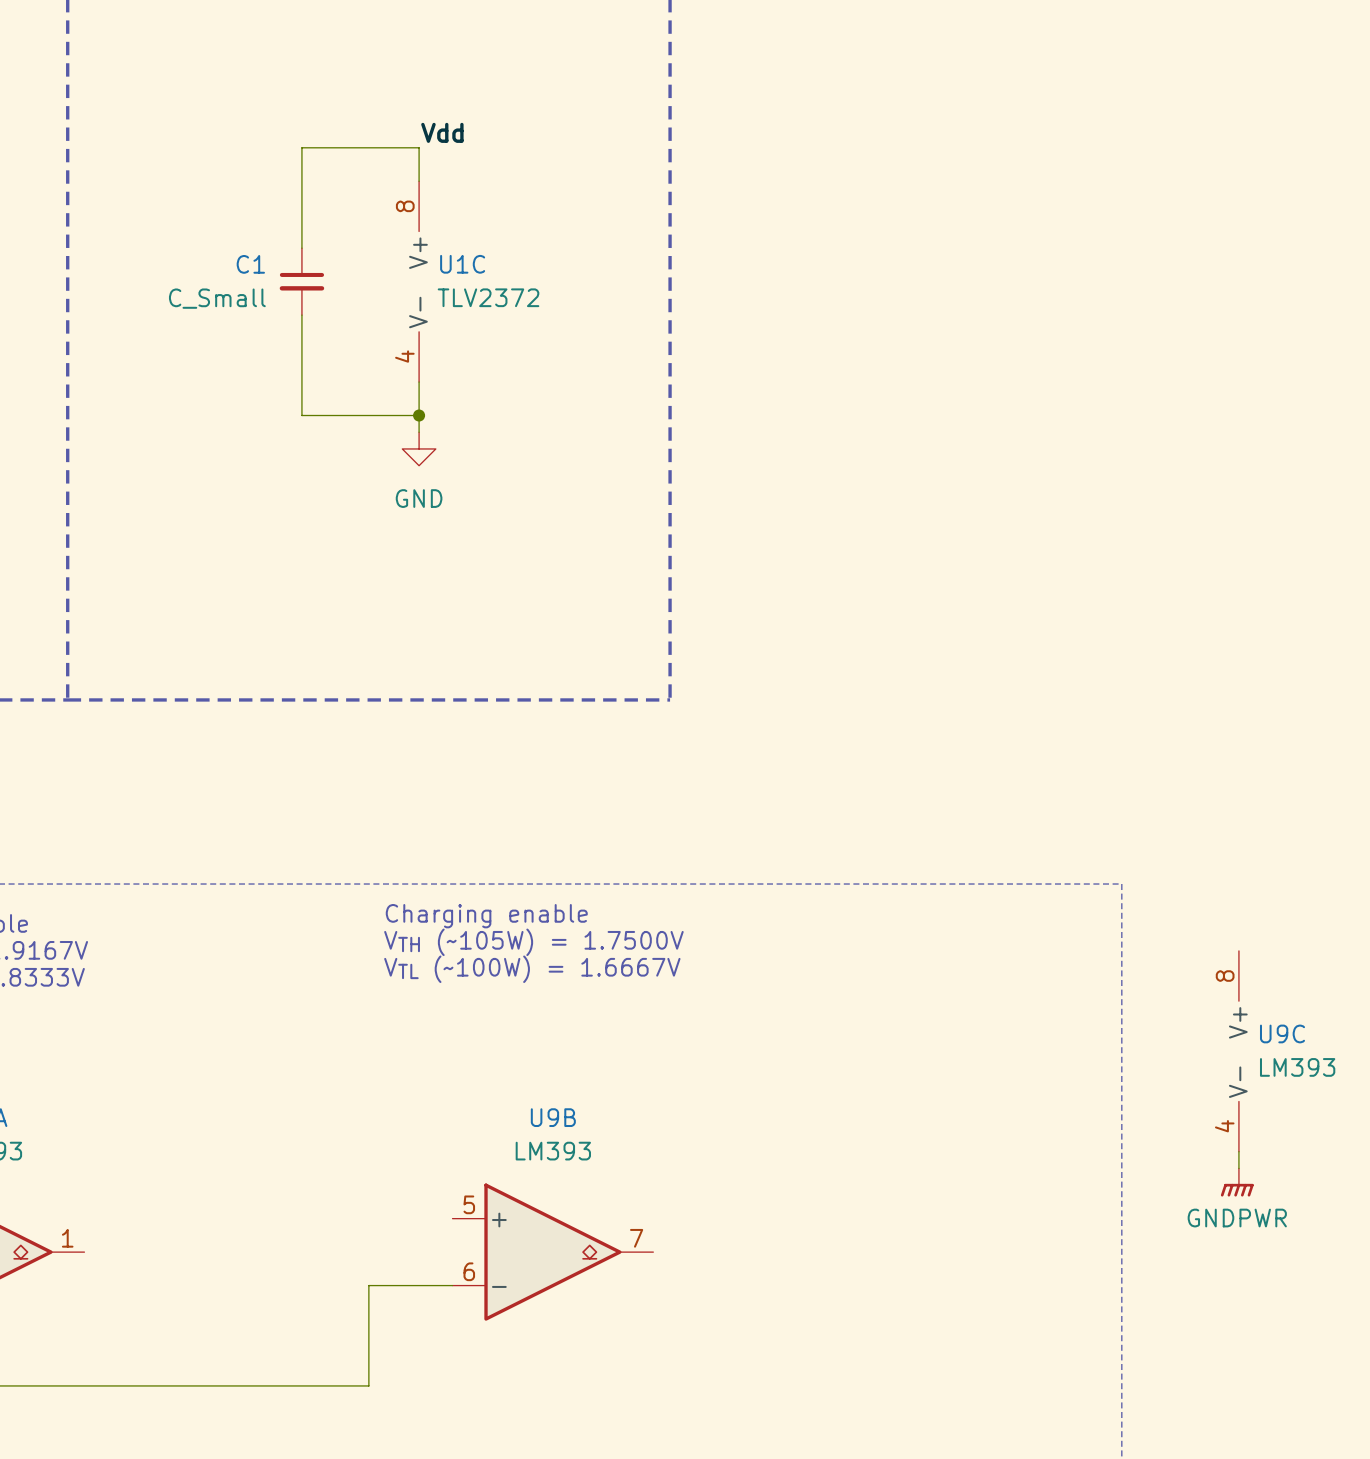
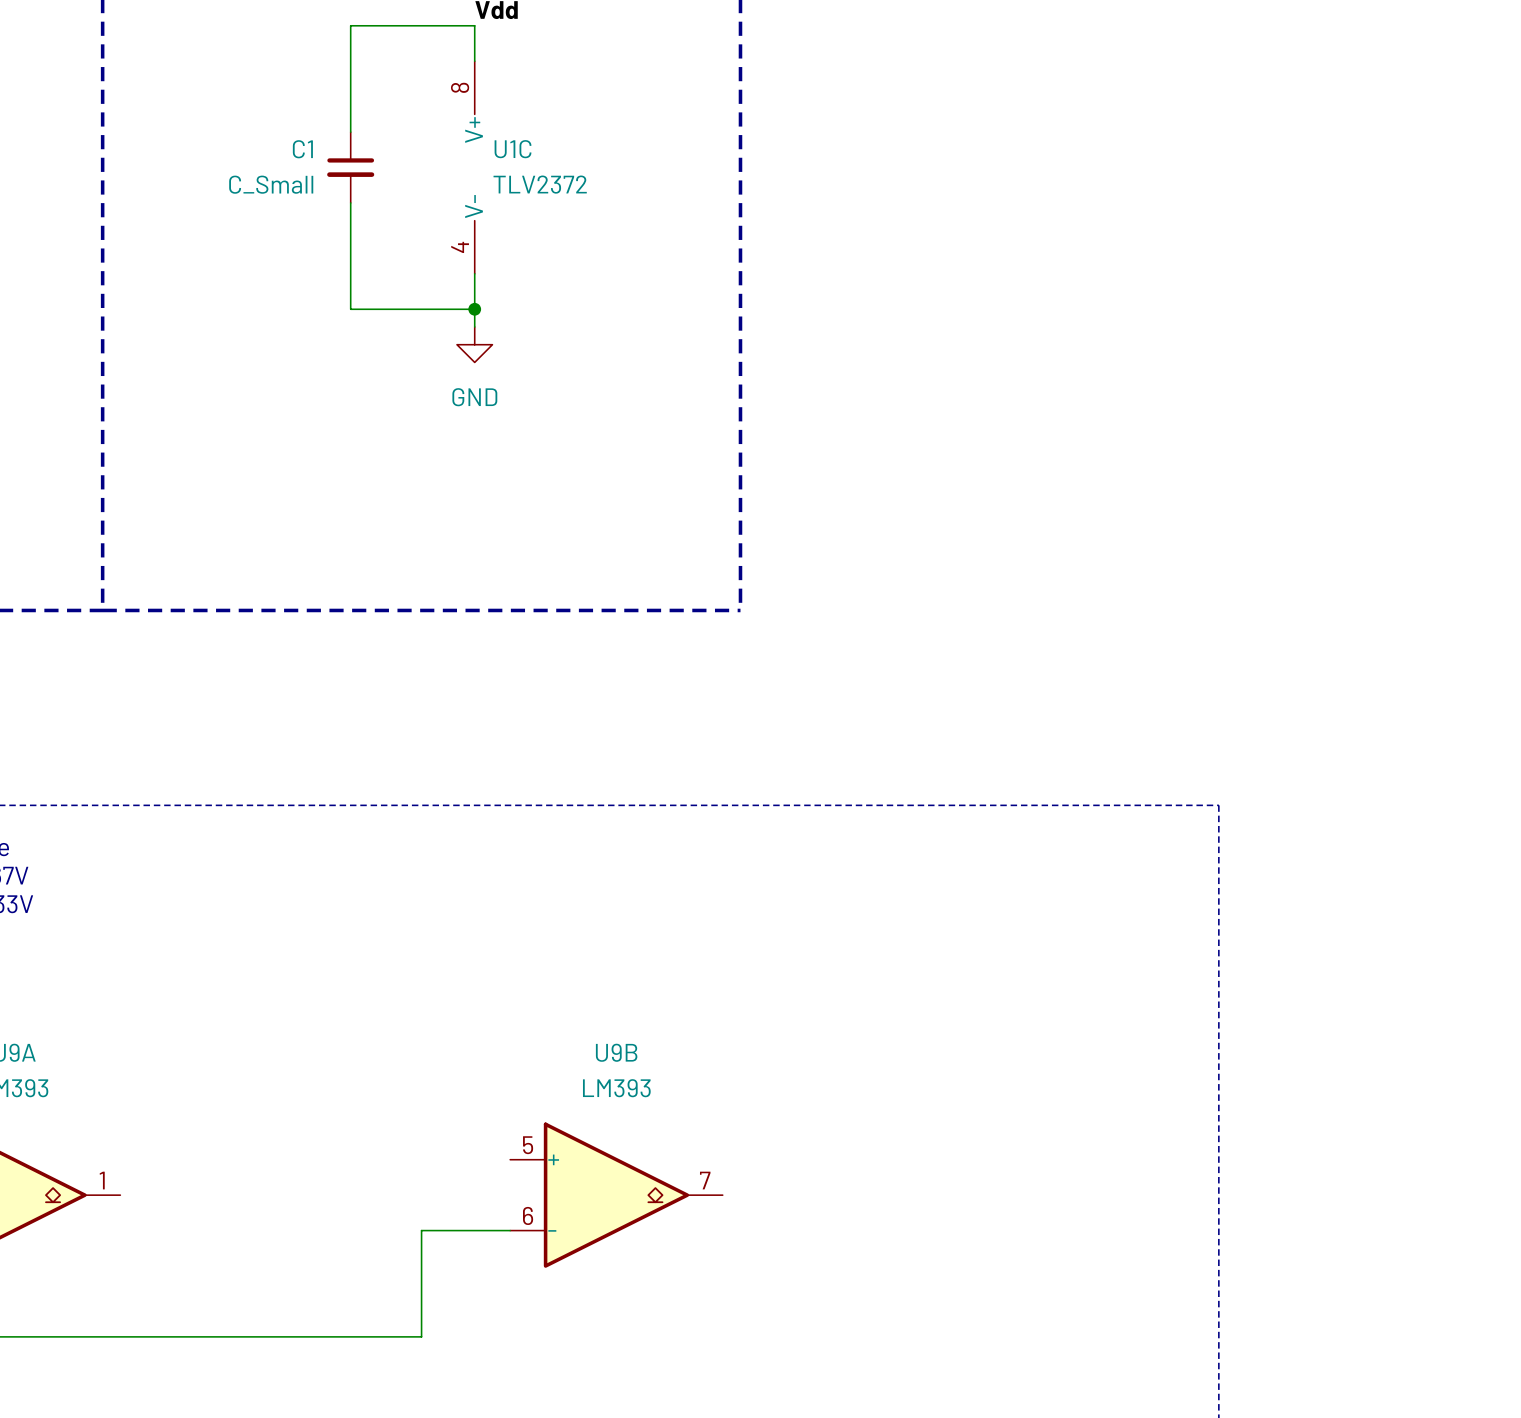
text: Charging enable (486, 916) -> none
text: VTH (~105W) = 1.7500V (533, 942) -> none
text: VTL (~100W) = 1.6667V (532, 969) -> none
U9C: LM393 (1238, 1051) -> none
wire: (1238, 1151) (1238, 1168) -> none
power symbol: GNDPWR (1237, 1182) -> none

